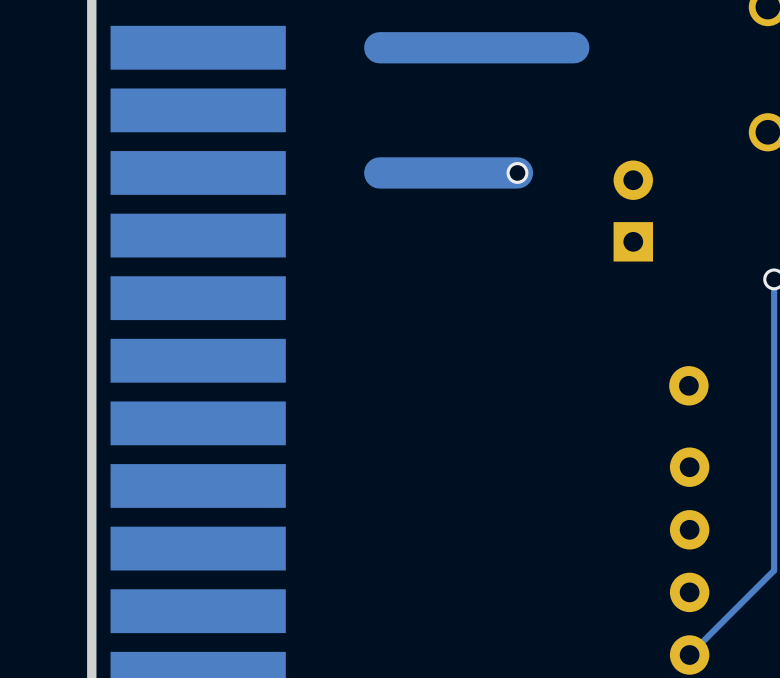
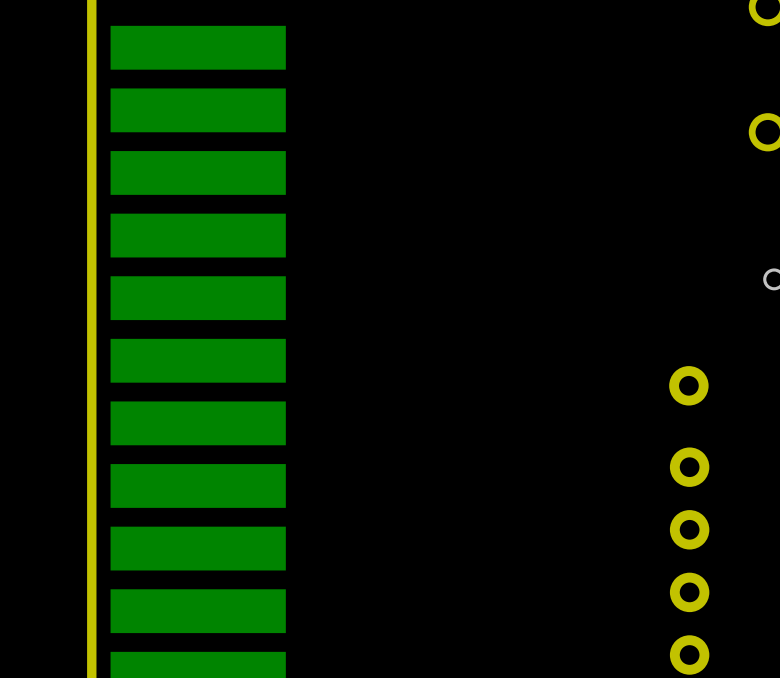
track: (573, 47) (379, 47) -> none
track: (517, 172) (379, 172) -> none
via: (517, 172) -> none
part: (633, 211) -> none
track: (774, 279) (774, 570) (689, 655) -> none

